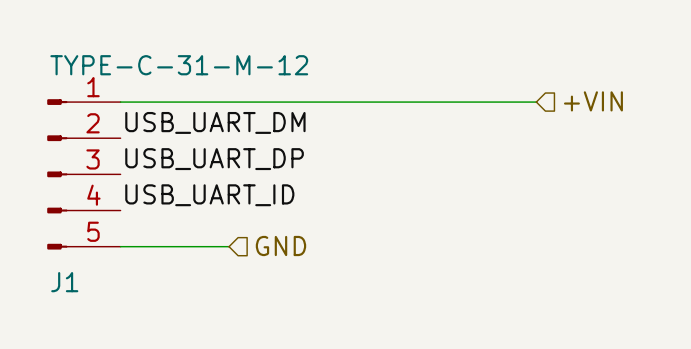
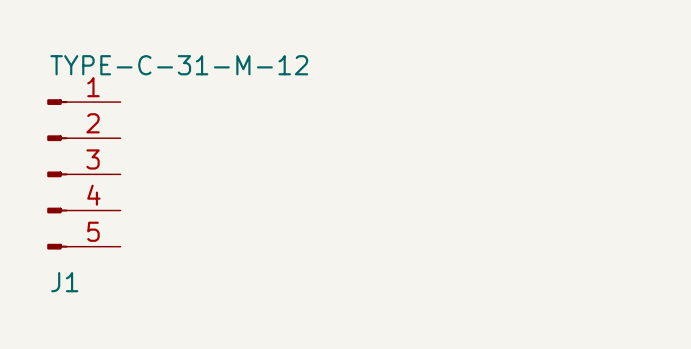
hierarchical label: +VIN (593, 101) -> none
wire: (120, 102) (536, 102) -> none
label: USB_UART_DM (215, 122) -> none
label: USB_UART_DP (214, 159) -> none
label: USB_UART_ID (209, 195) -> none
wire: (120, 246) (229, 246) -> none
hierarchical label: GND (280, 246) -> none

